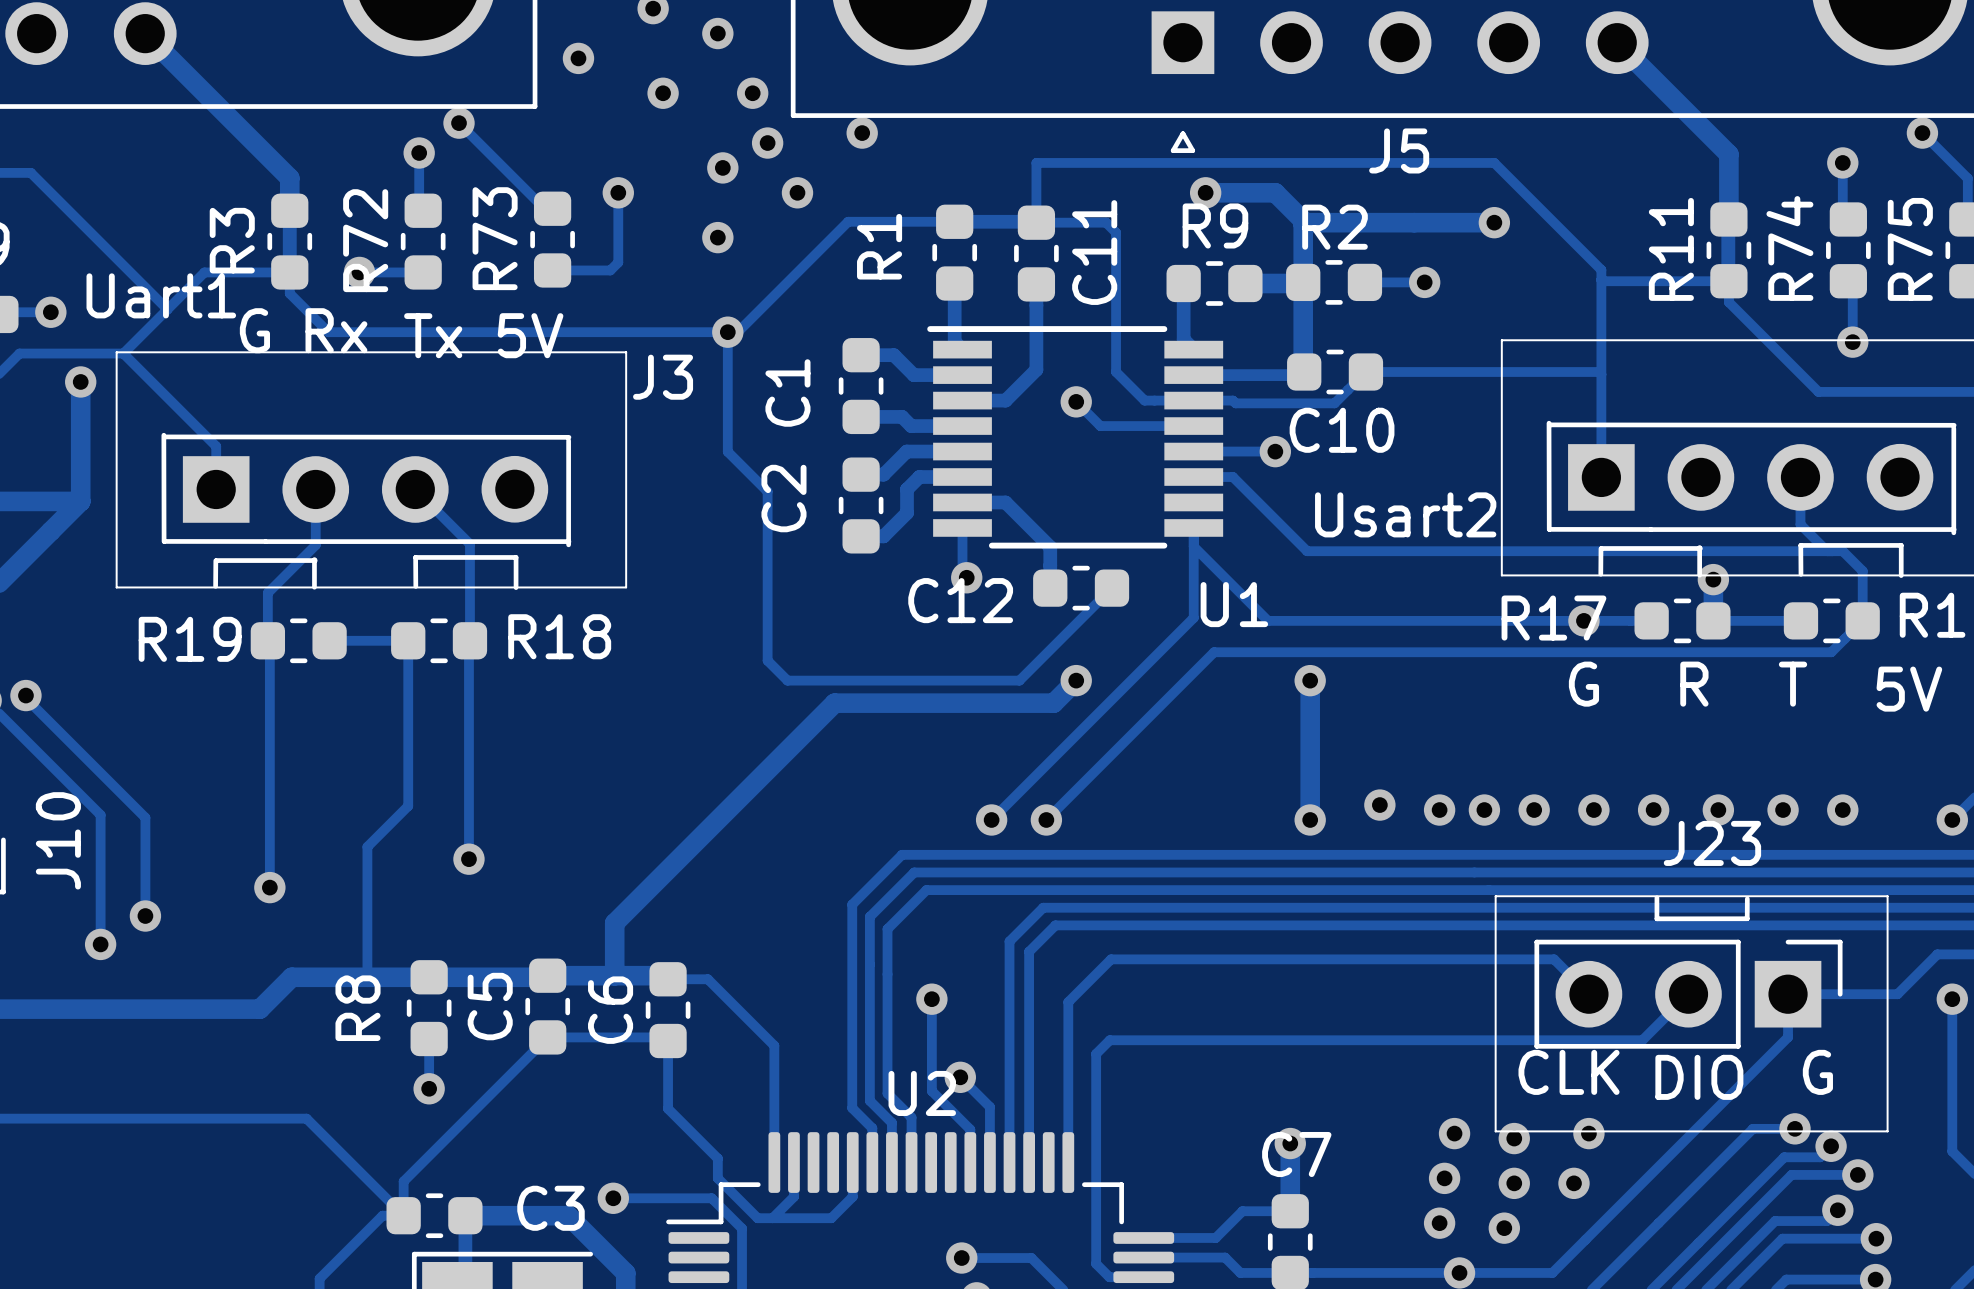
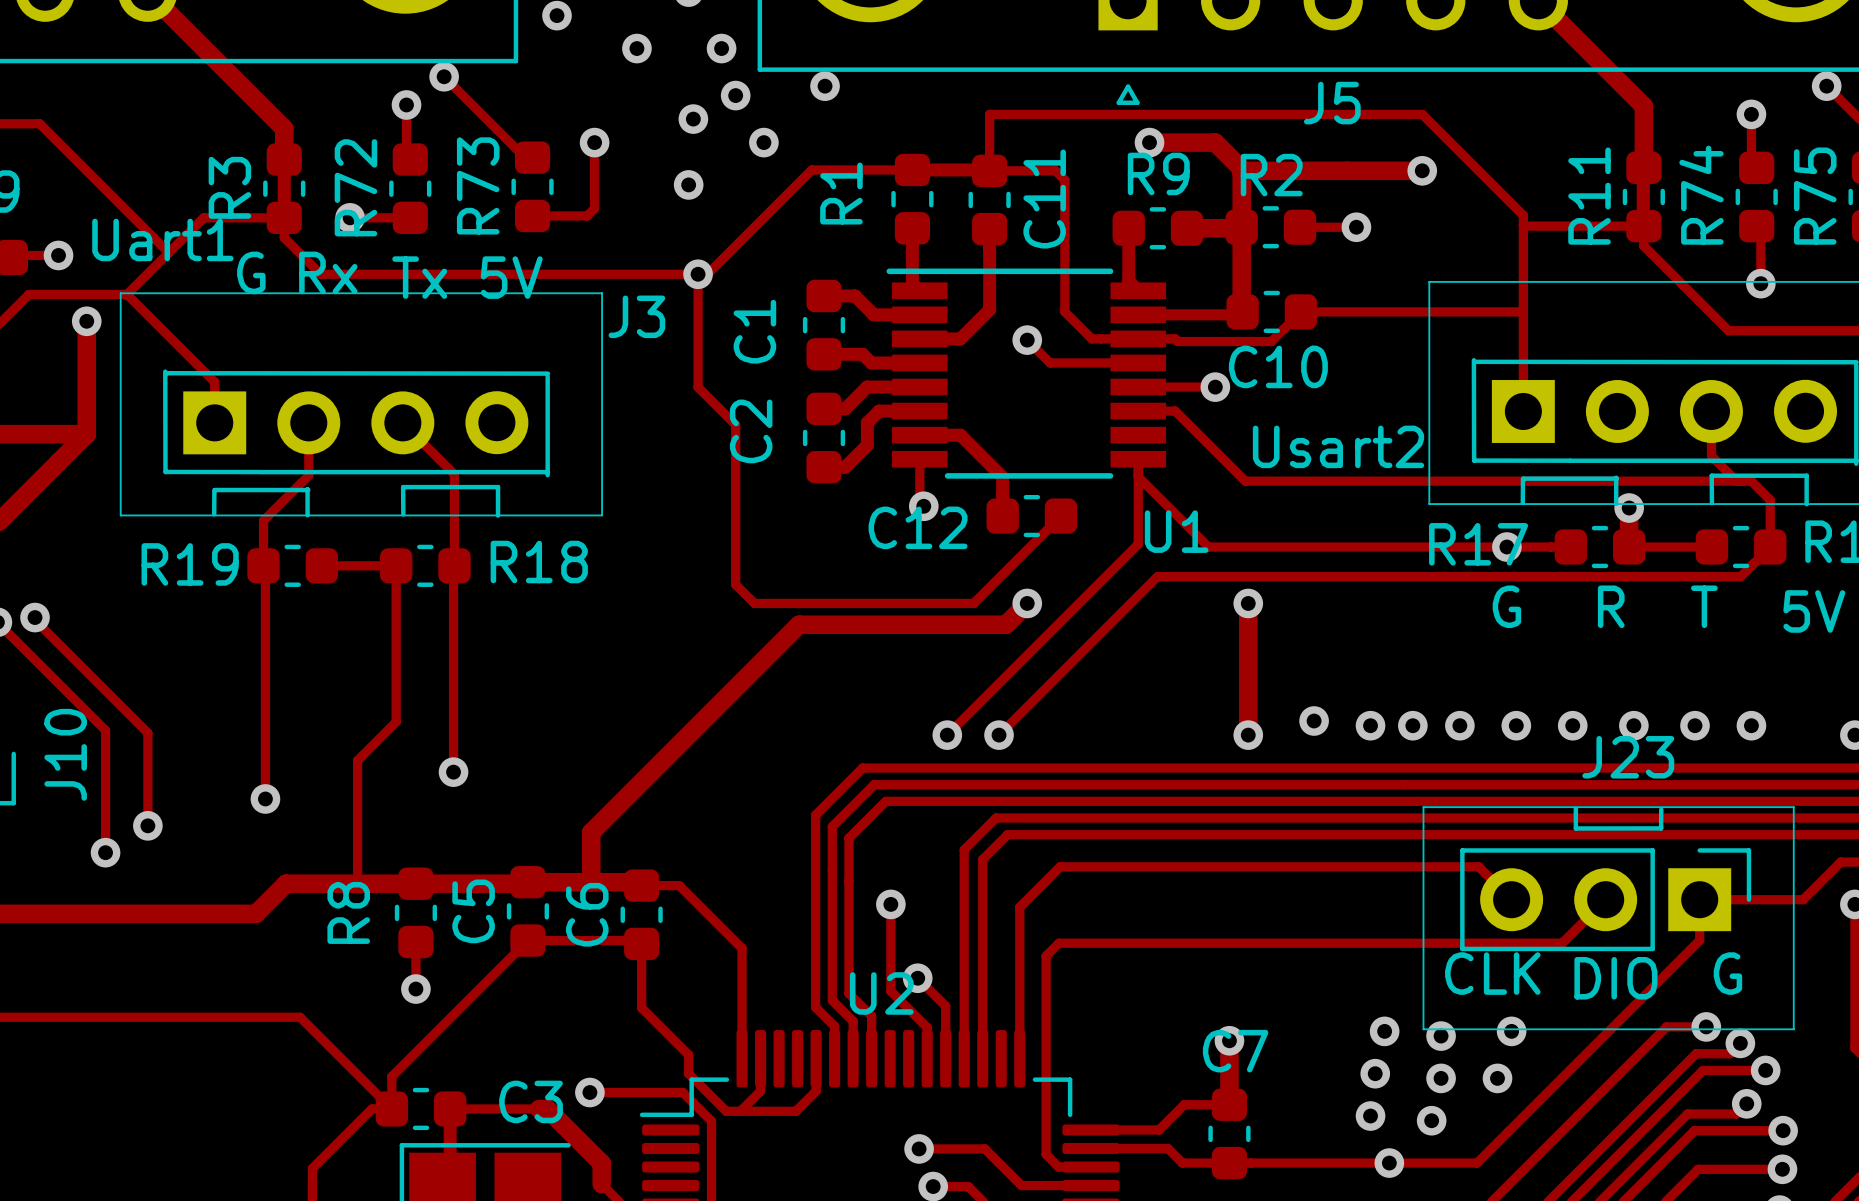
track width: thick (465, 1215) (559, 1215) -> thin (450, 1108) (539, 1108)

